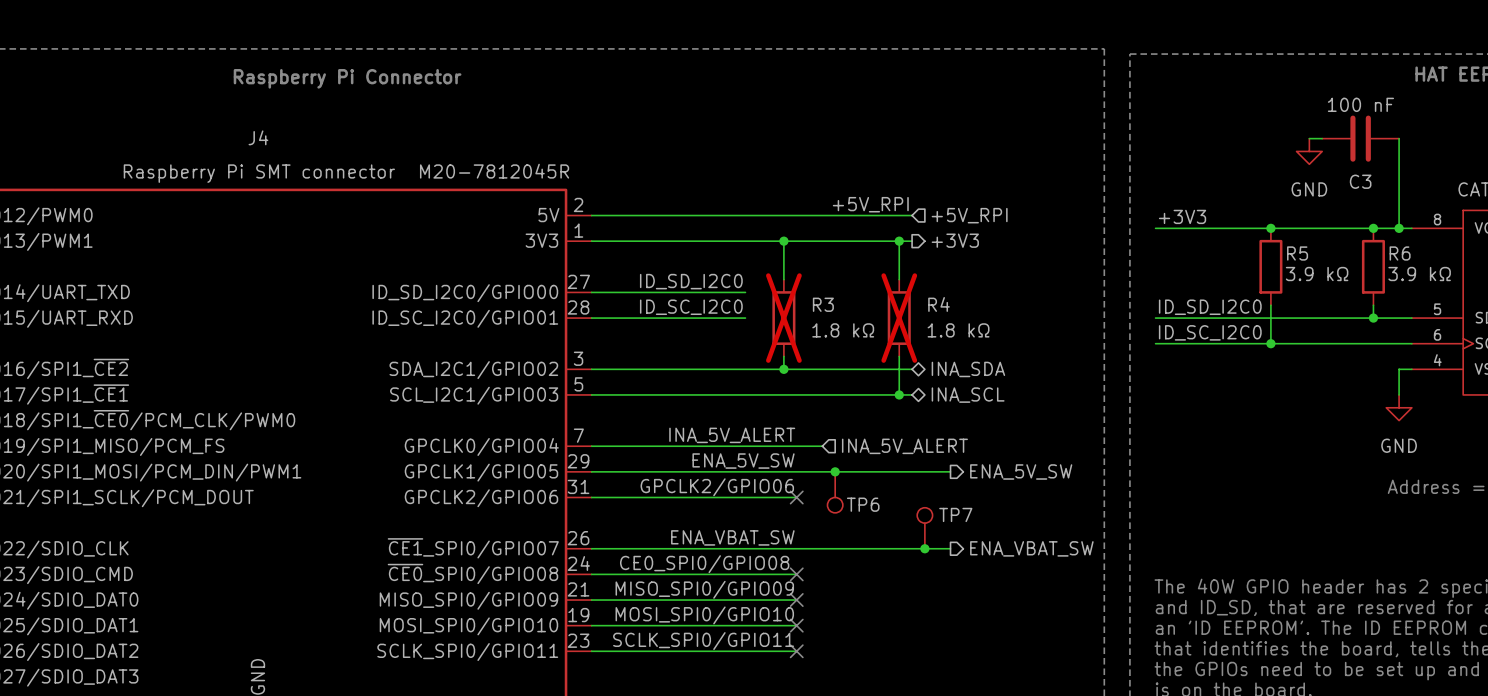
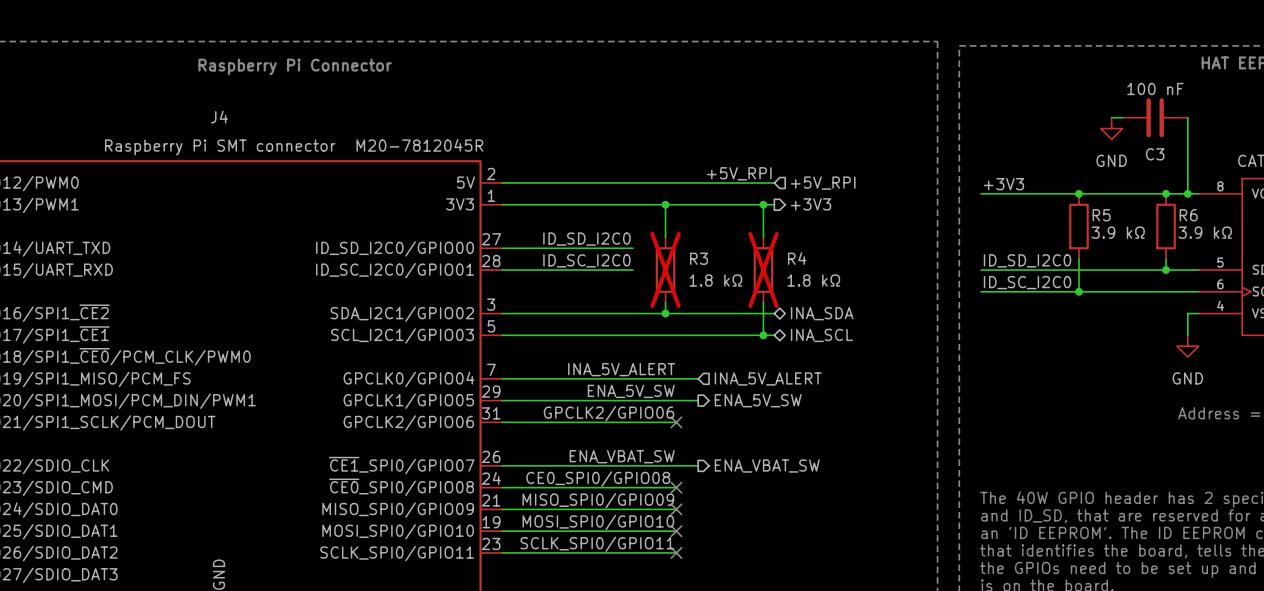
wire: (822, 471) (950, 471) -> none
junction: (835, 471) -> none
hierarchical label position: ENA_5V_SW (1021, 471) -> ENA_5V_SW (758, 400)
TP6: (835, 492) -> none
TP7: (924, 528) -> none
wire: (822, 548) (950, 548) -> none
junction: (924, 548) -> none
hierarchical label position: ENA_VBAT_SW (1031, 548) -> ENA_VBAT_SW (767, 466)

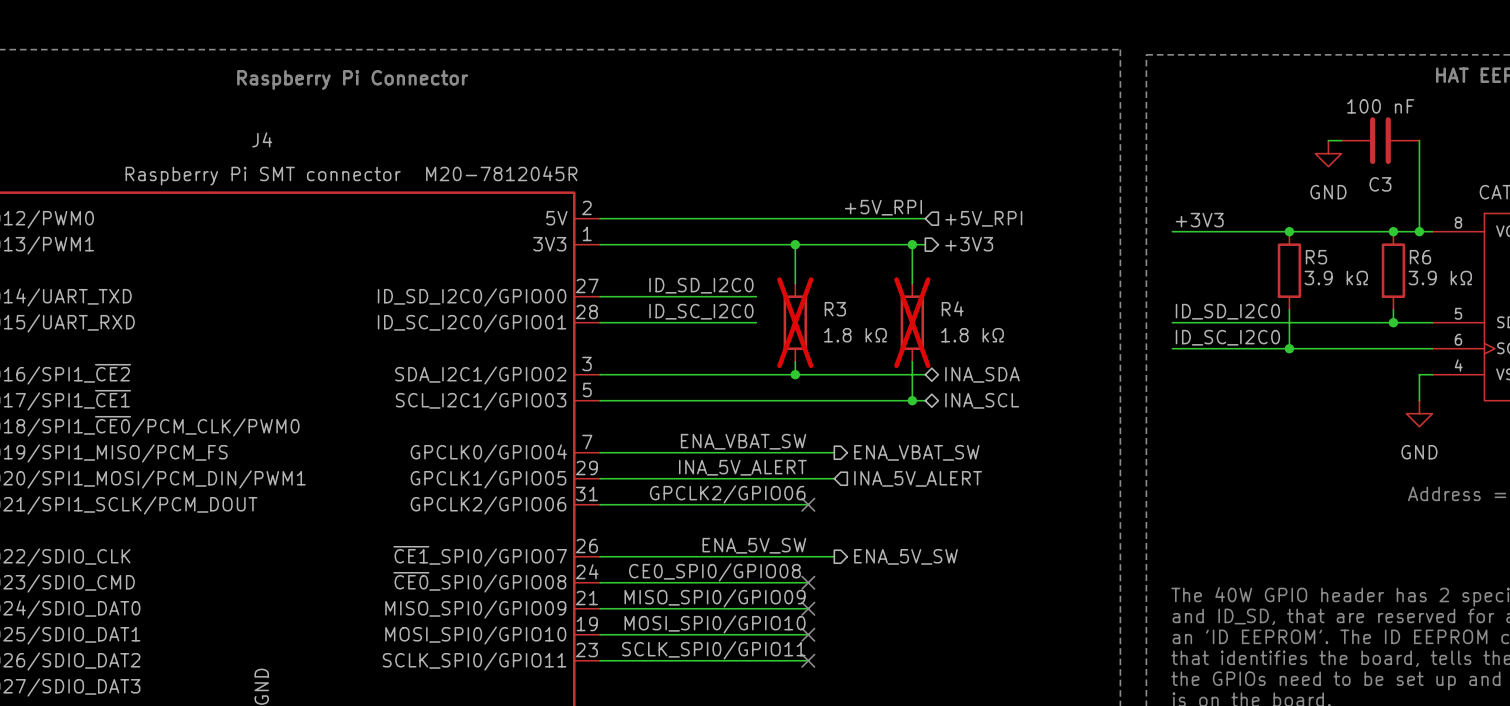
label: INA_5V_ALERT (621, 369) -> ENA_VBAT_SW (743, 441)
hierarchical label shape: input (768, 378) -> output (916, 452)
hierarchical label: INA_5V_ALERT (768, 378) -> ENA_VBAT_SW (916, 452)
label: ENA_5V_SW (631, 391) -> INA_5V_ALERT (742, 467)
hierarchical label shape: output (758, 400) -> input (918, 478)
hierarchical label: ENA_5V_SW (758, 400) -> INA_5V_ALERT (918, 478)
label: ENA_VBAT_SW (622, 456) -> ENA_5V_SW (754, 545)
hierarchical label: ENA_VBAT_SW (767, 466) -> ENA_5V_SW (906, 556)

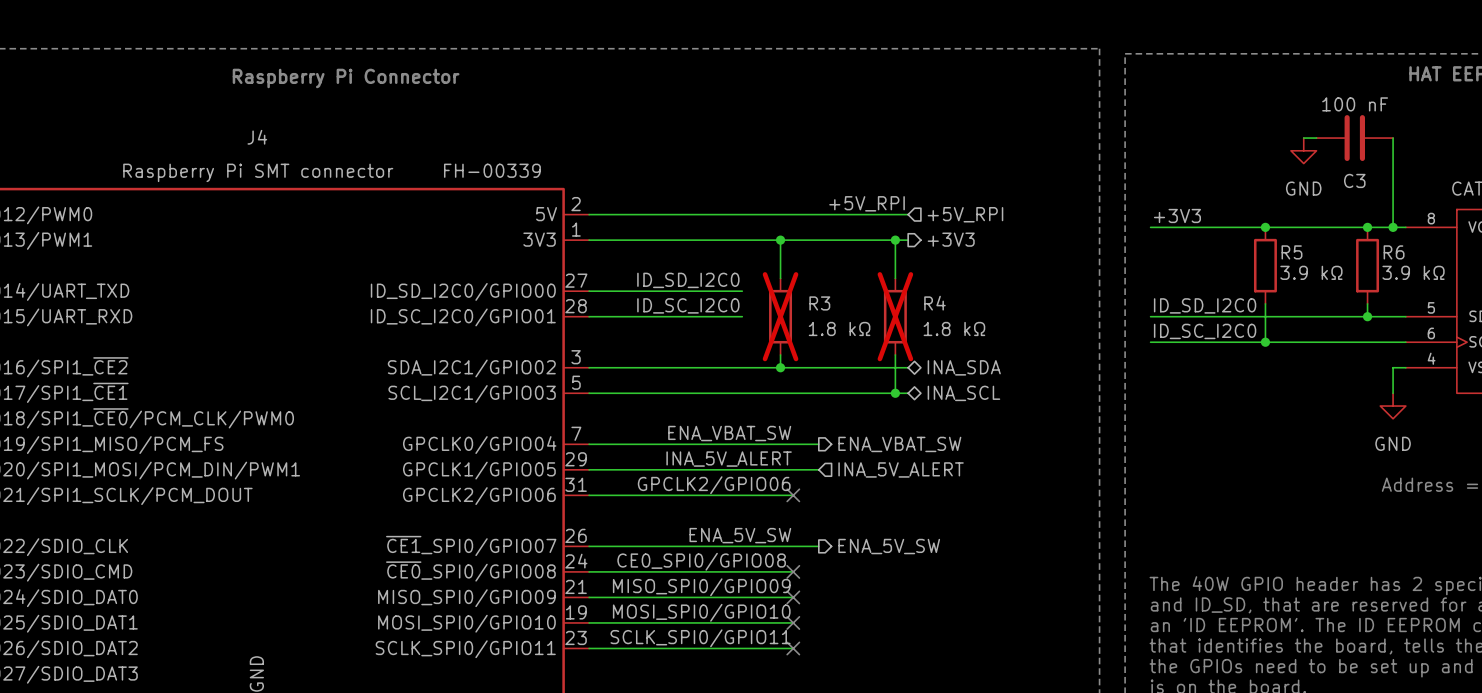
J4 text: M20-7812045R (501, 173) -> FH-00339 (492, 170)

